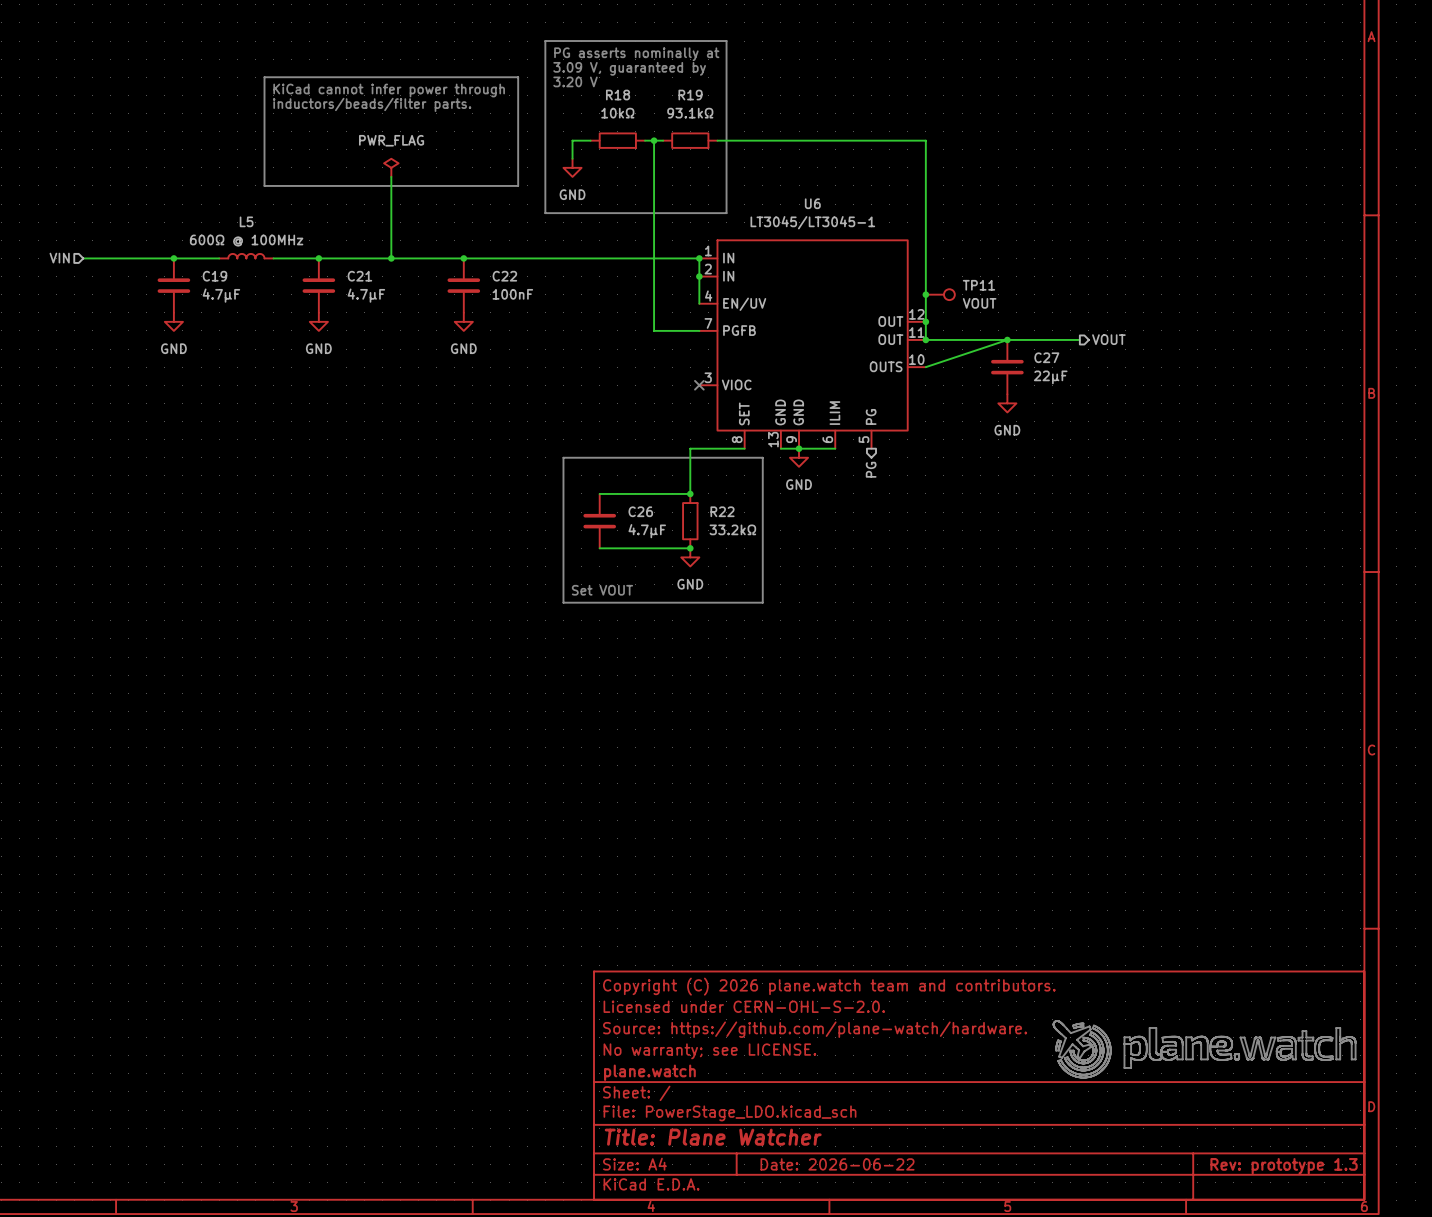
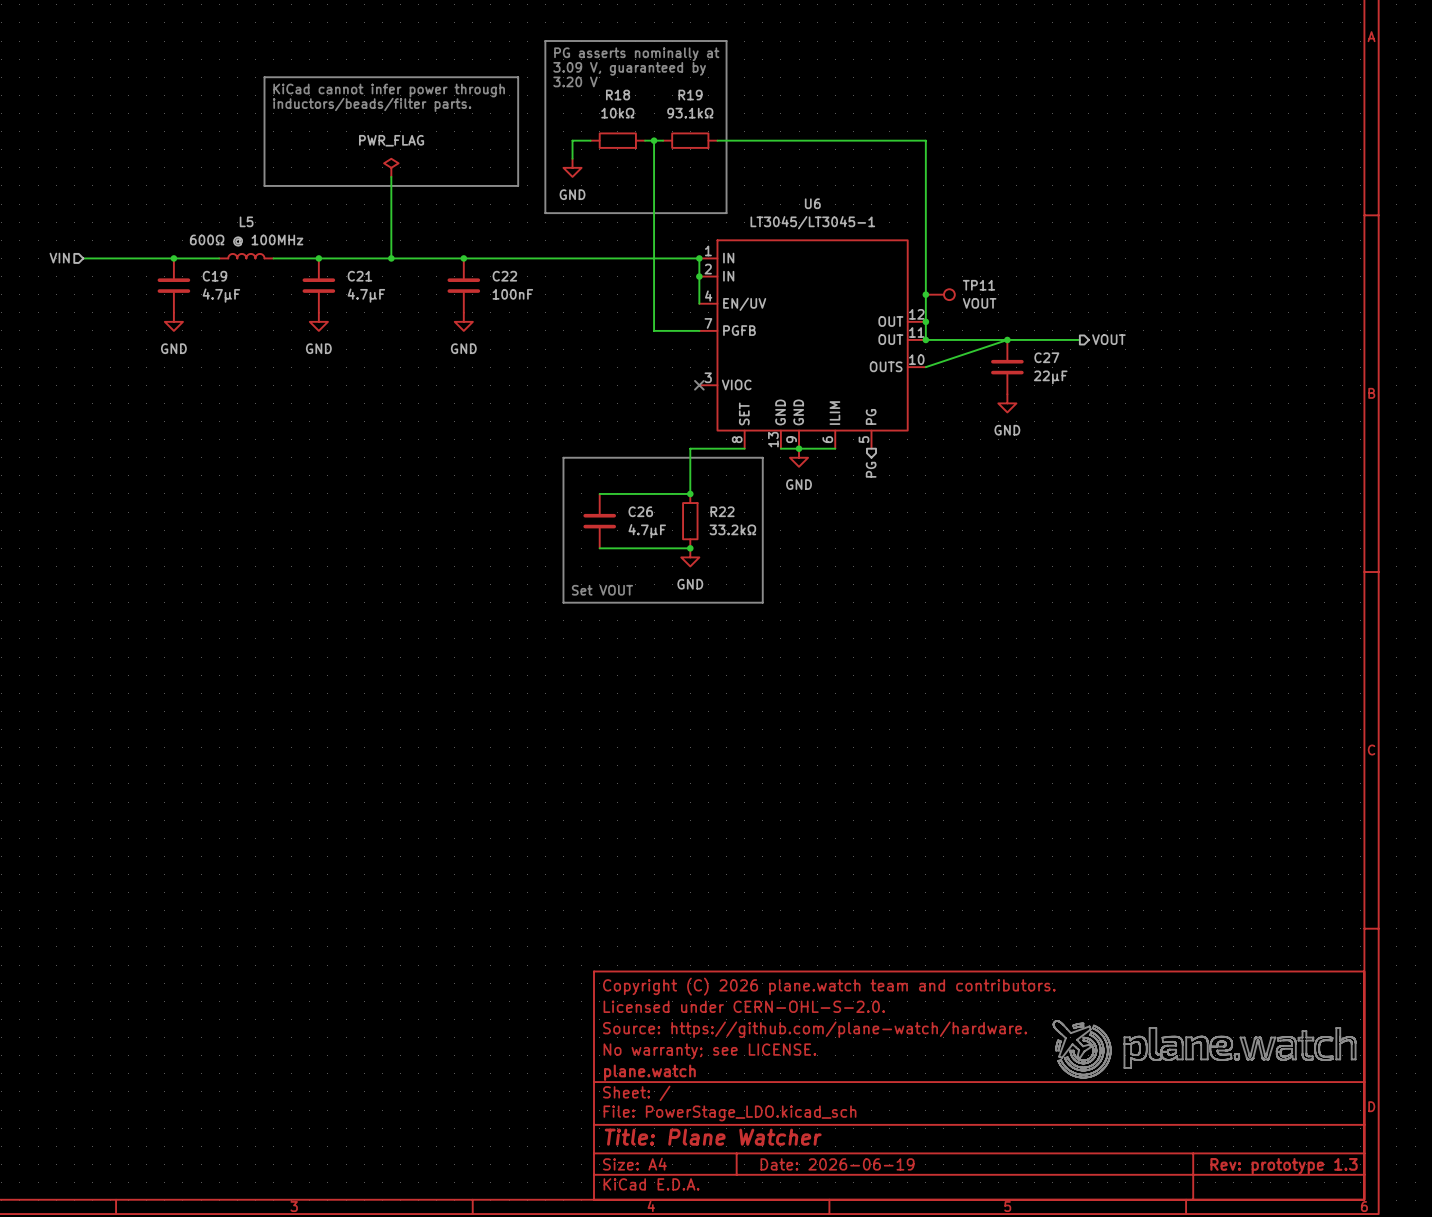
title block: Date: 2026-06-22 (837, 1164) -> Date: 2026-06-19 (837, 1164)

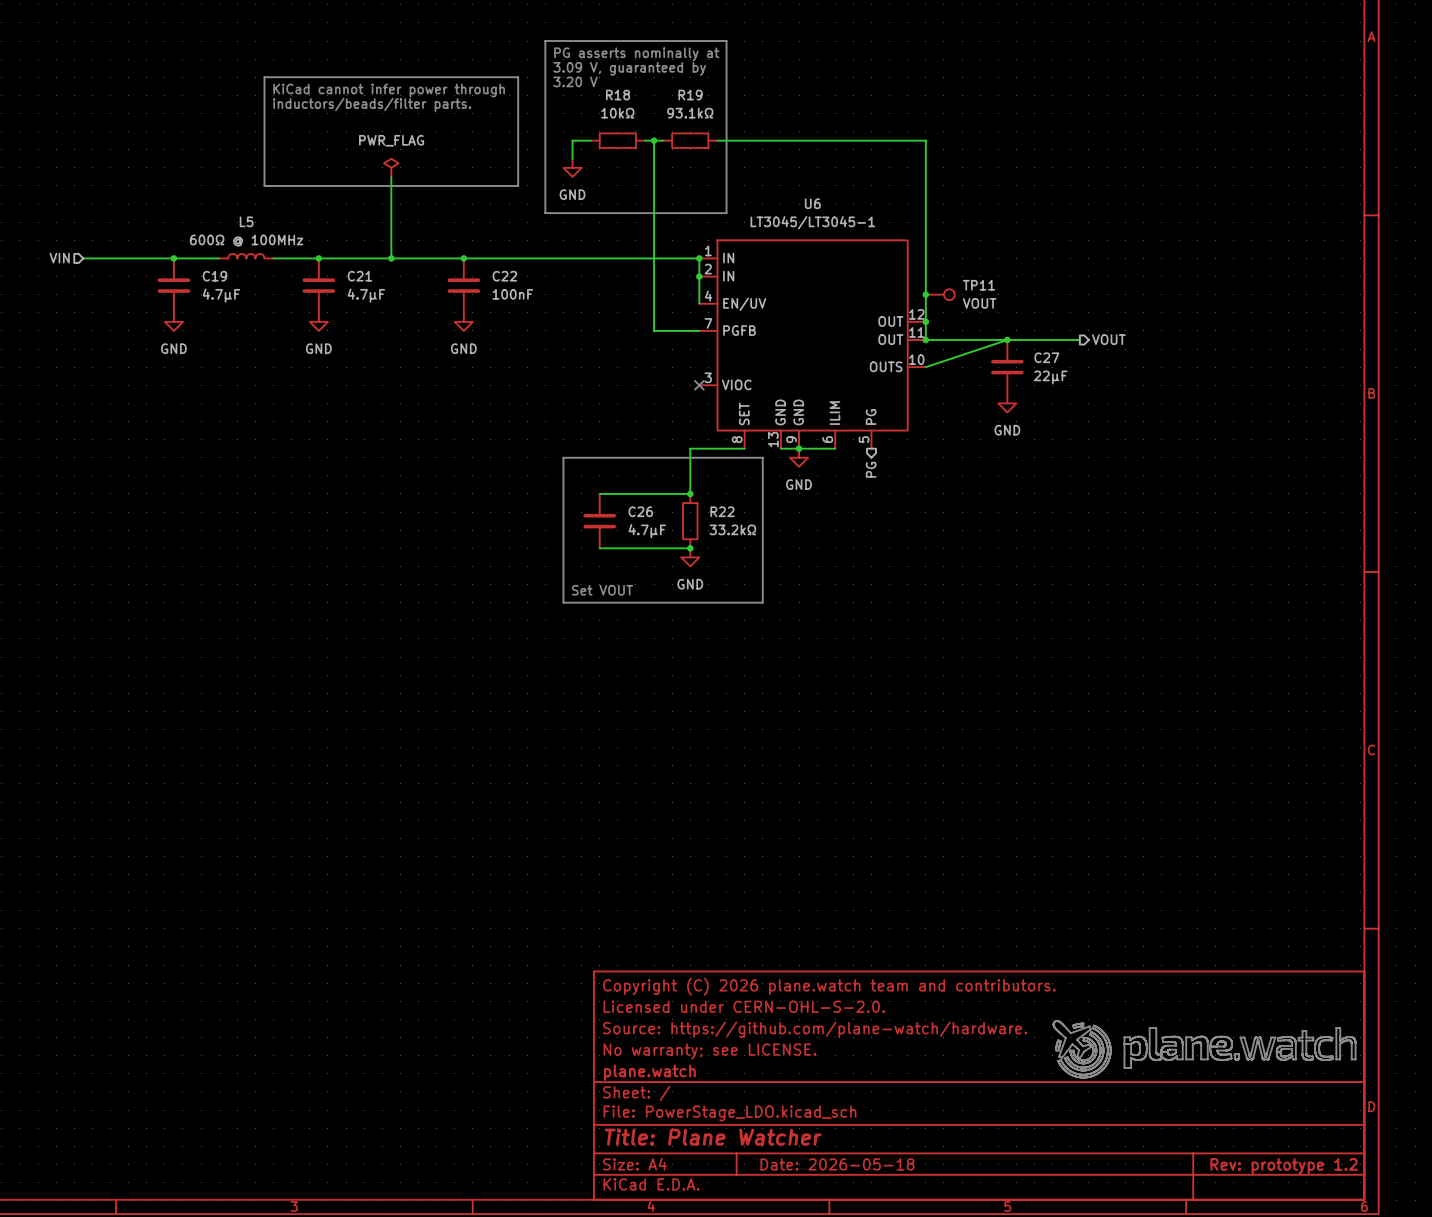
title block: Date: 2026-06-19 (837, 1164) -> Date: 2026-05-18 (837, 1164)
title block: Rev: prototype 1.3 (1284, 1166) -> Rev: prototype 1.2 (1284, 1166)

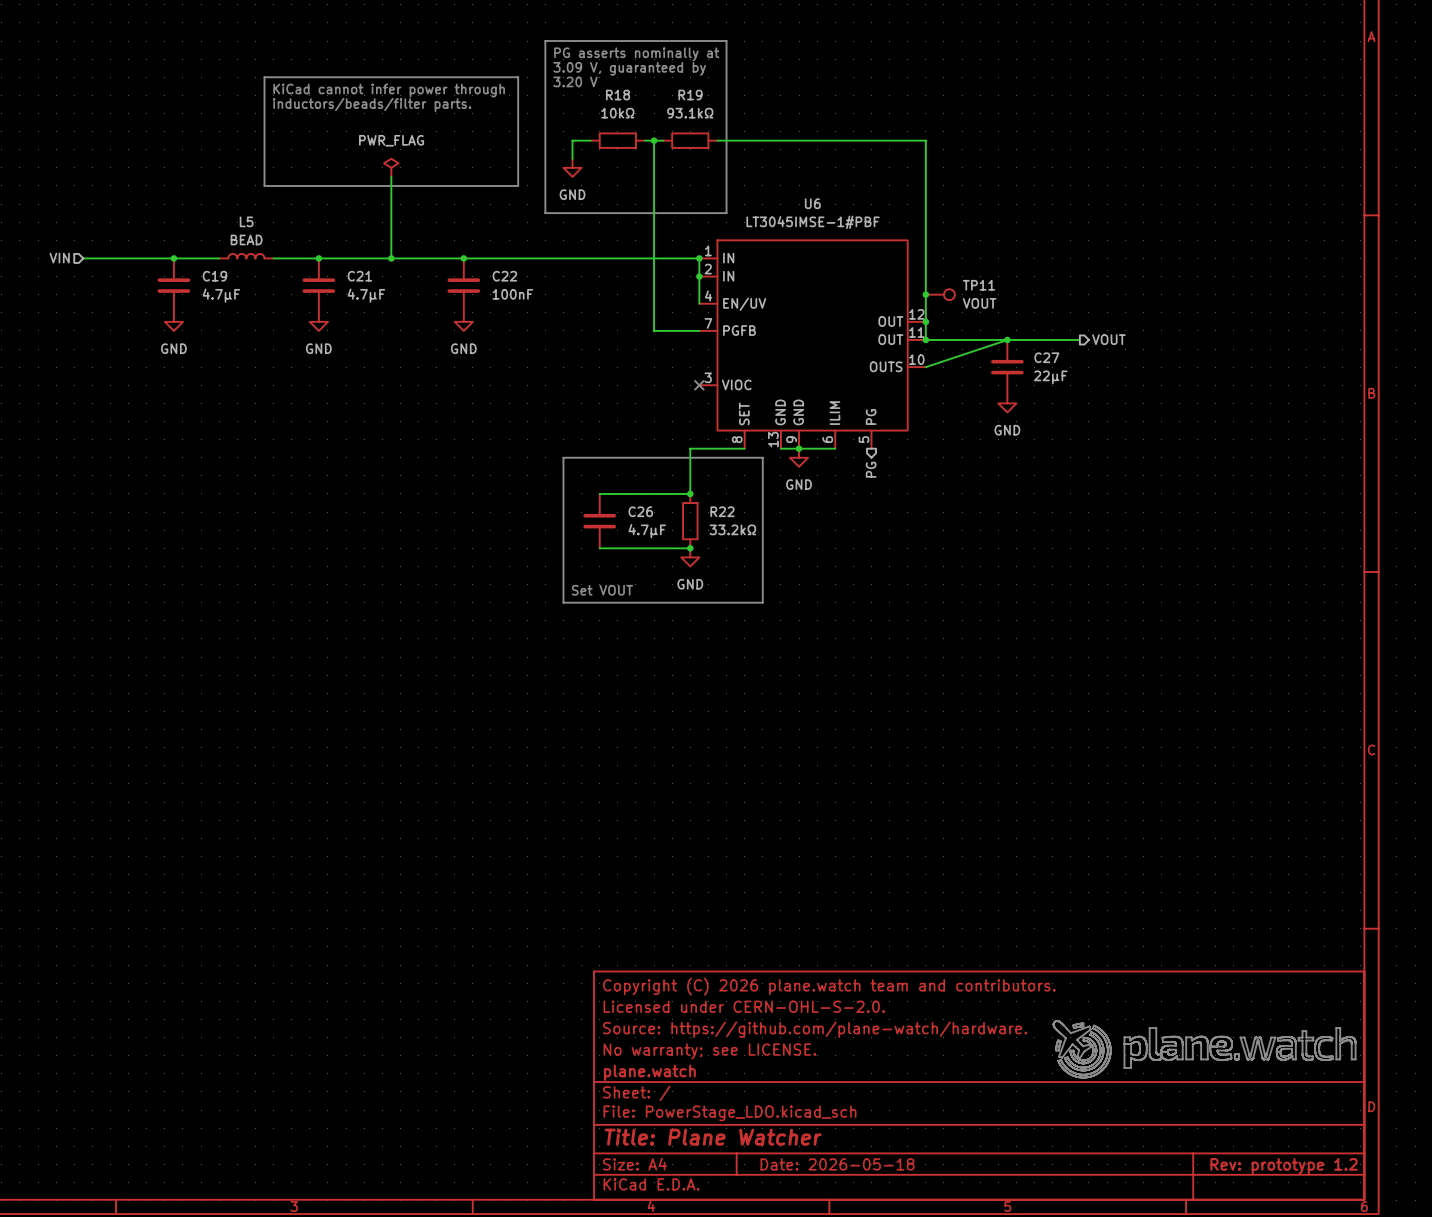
U6 value: LT3045/LT3045-1 (812, 222) -> LT3045IMSE-1#PBF (813, 222)
L5 value: 600Ω @ 100MHz (246, 240) -> BEAD (246, 239)

